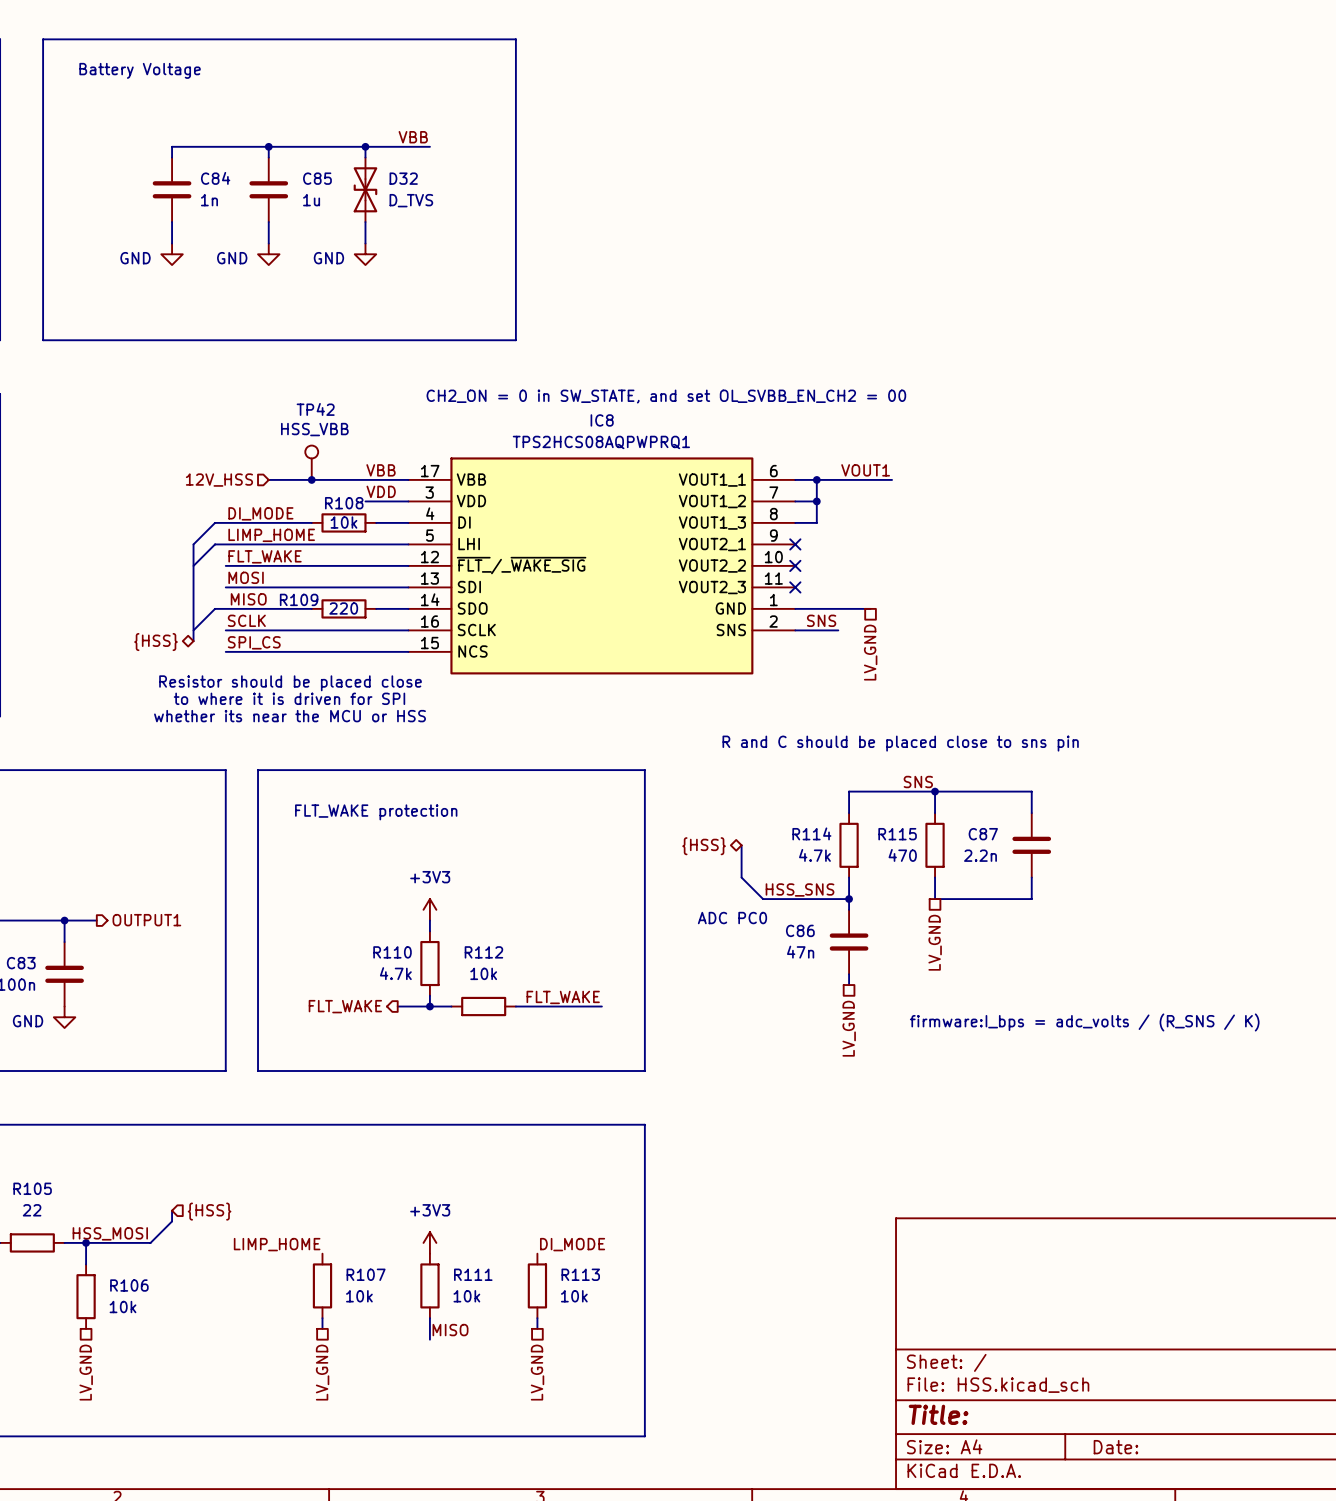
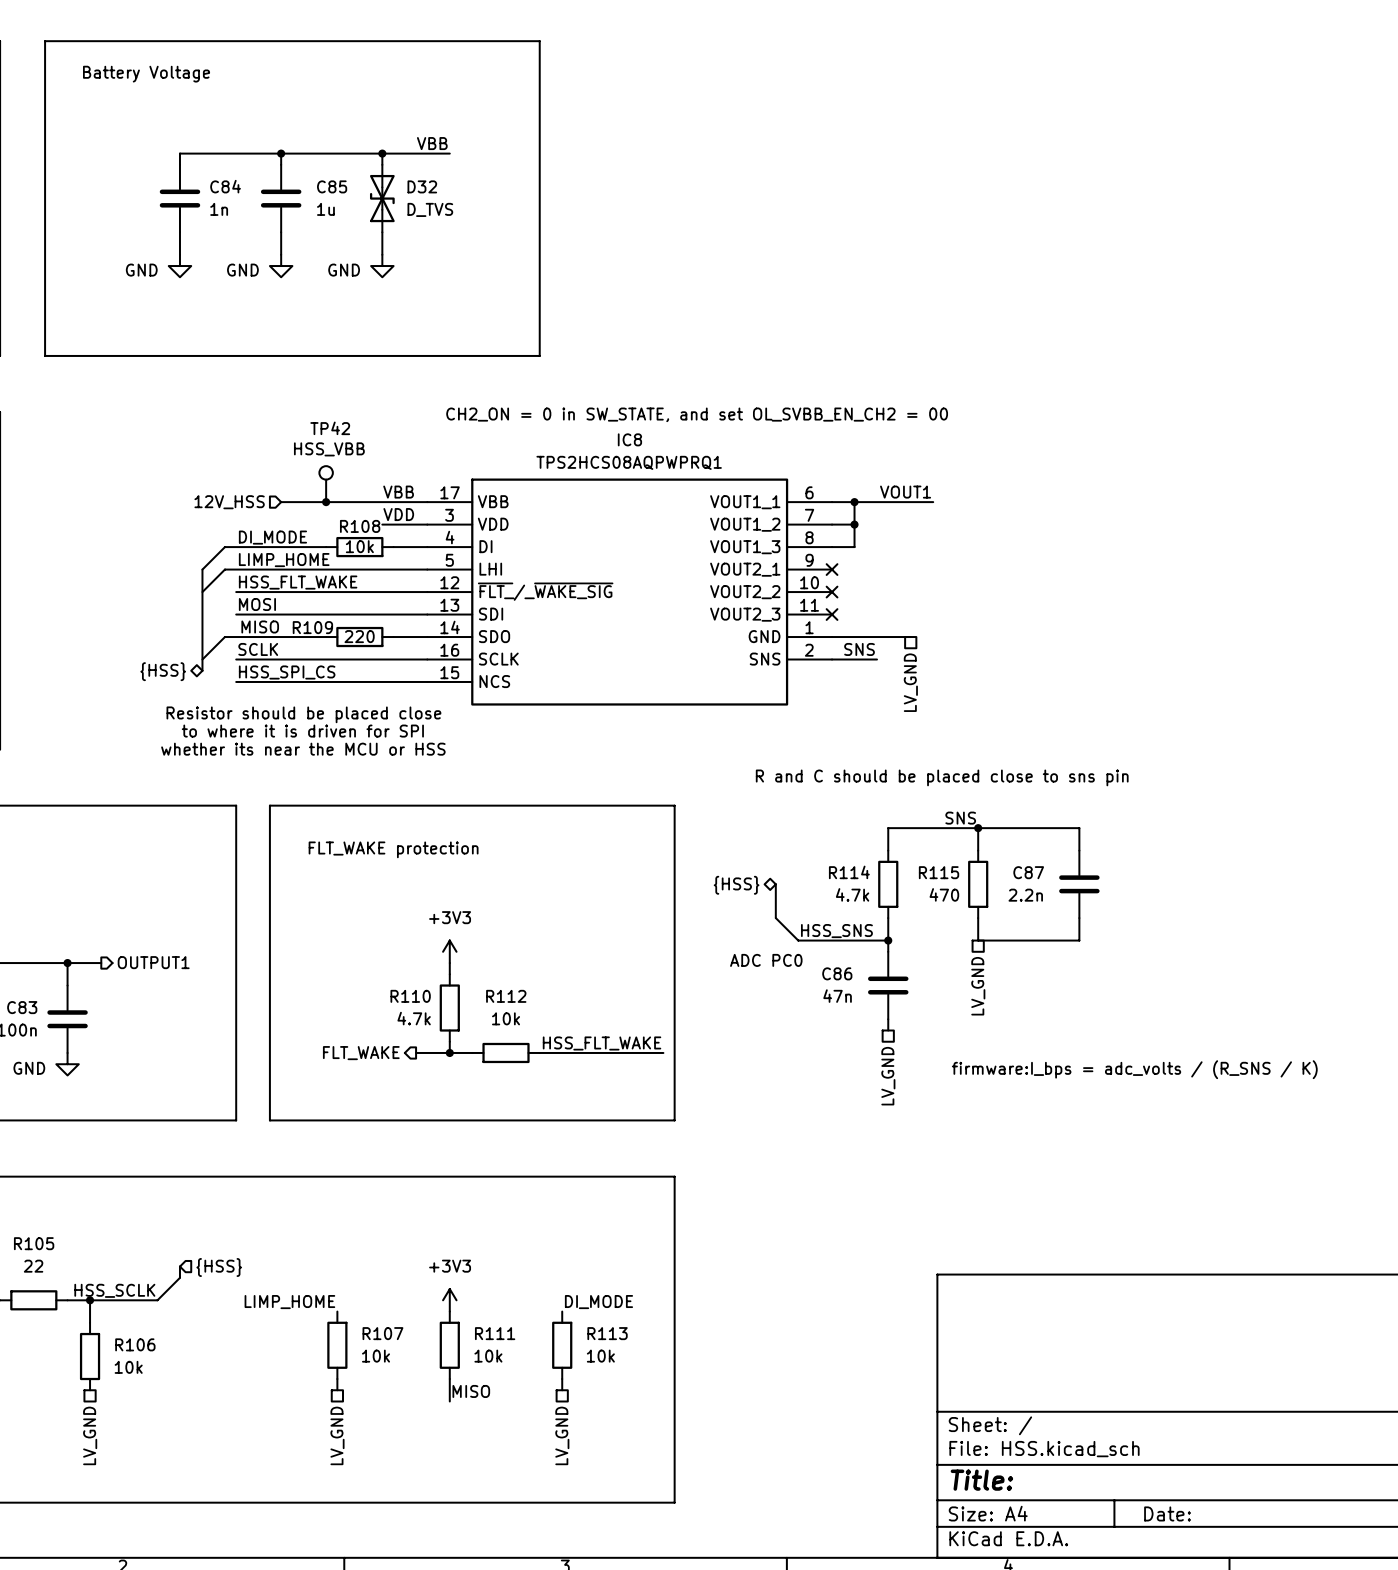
label: FLT_WAKE (265, 556) -> HSS_FLT_WAKE (298, 582)
label: SPI_CS (254, 642) -> HSS_SPI_CS (287, 672)
label: FLT_WAKE (563, 997) -> HSS_FLT_WAKE (602, 1043)
wire: none -> (629, 1052) (663, 1052)
label: HSS_MOSI (110, 1233) -> HSS_SCLK (114, 1290)

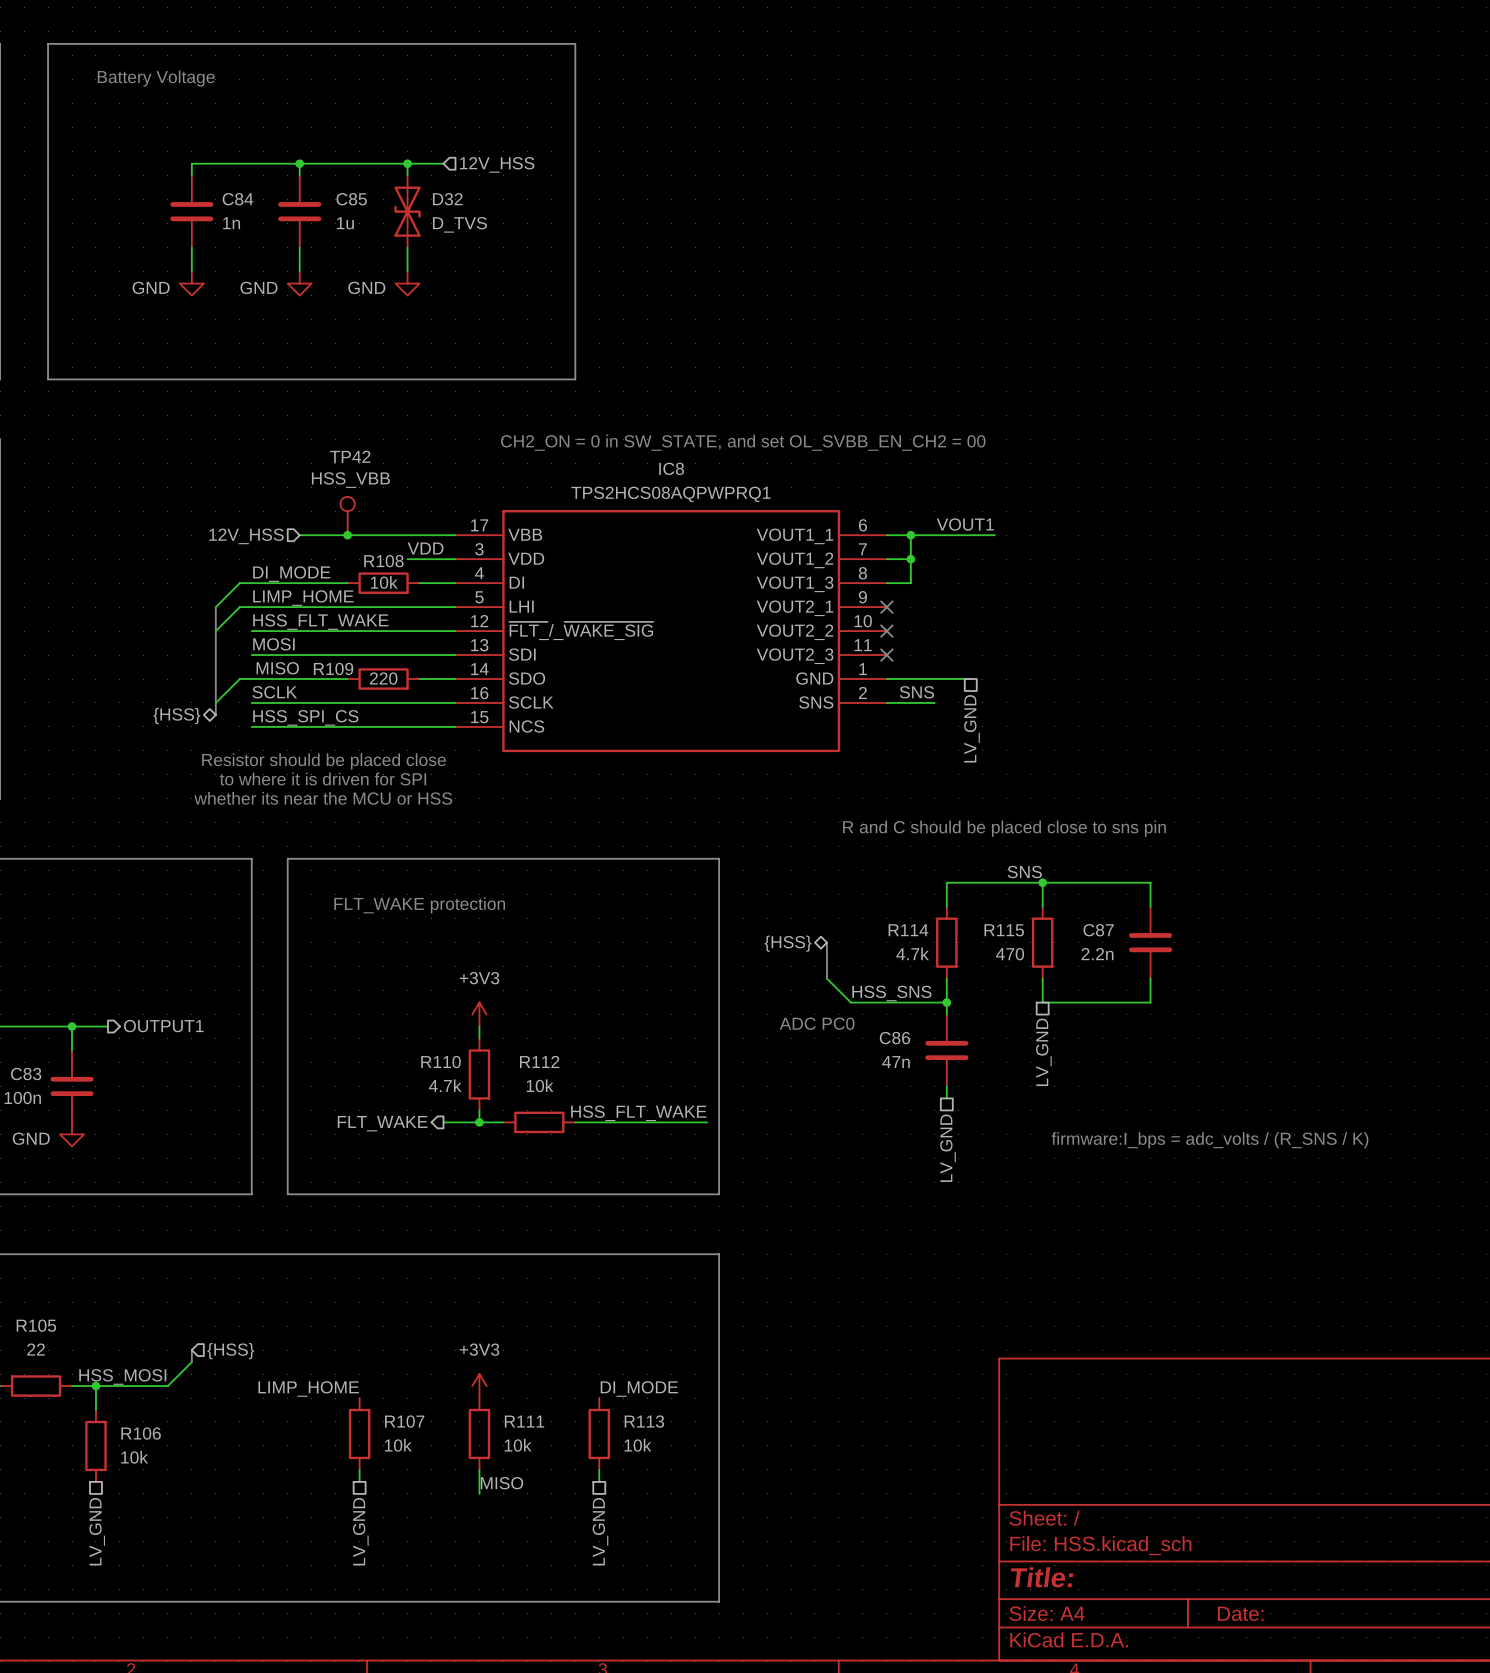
label: VBB (432, 143) -> none
wire: (416, 153) (449, 153) -> none
hierarchical label: none -> 12V_HSS (497, 164)
label: VBB (398, 492) -> none
label: HSS_SCLK (114, 1290) -> HSS_MOSI (122, 1376)

